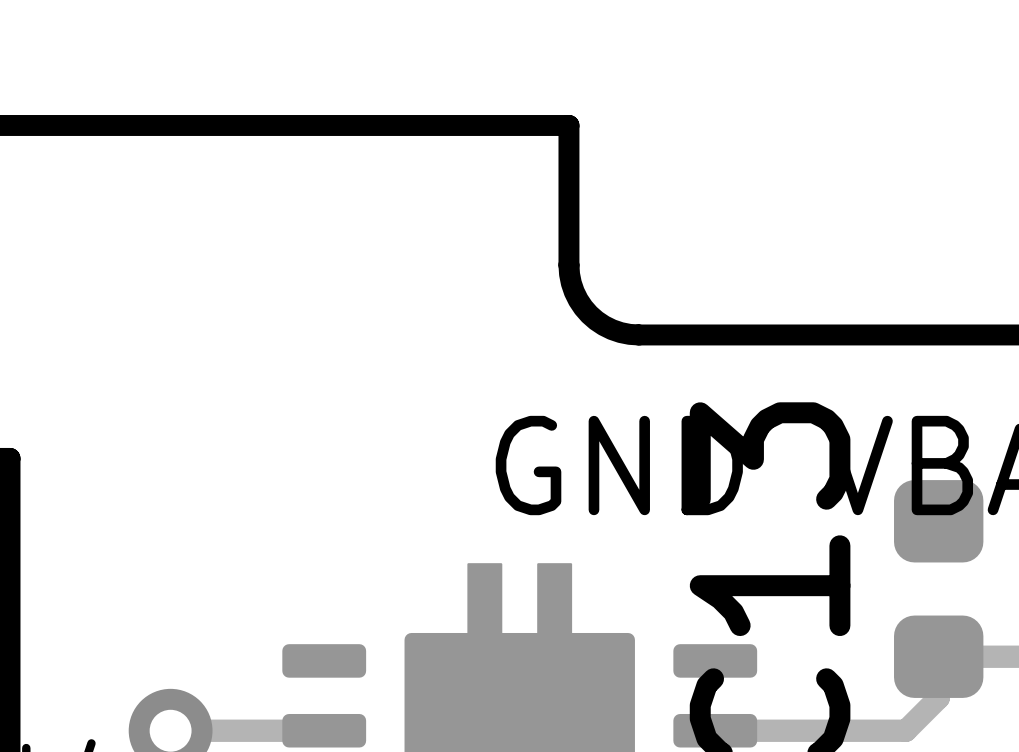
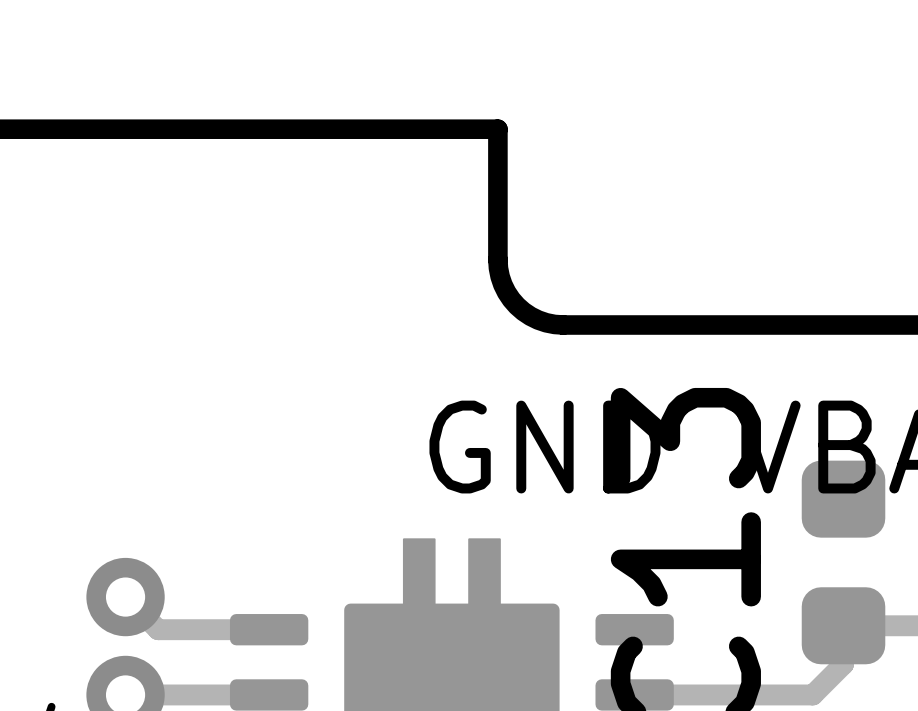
track: none -> (125, 597) (158, 629) (269, 629)
via: none -> (125, 597)

